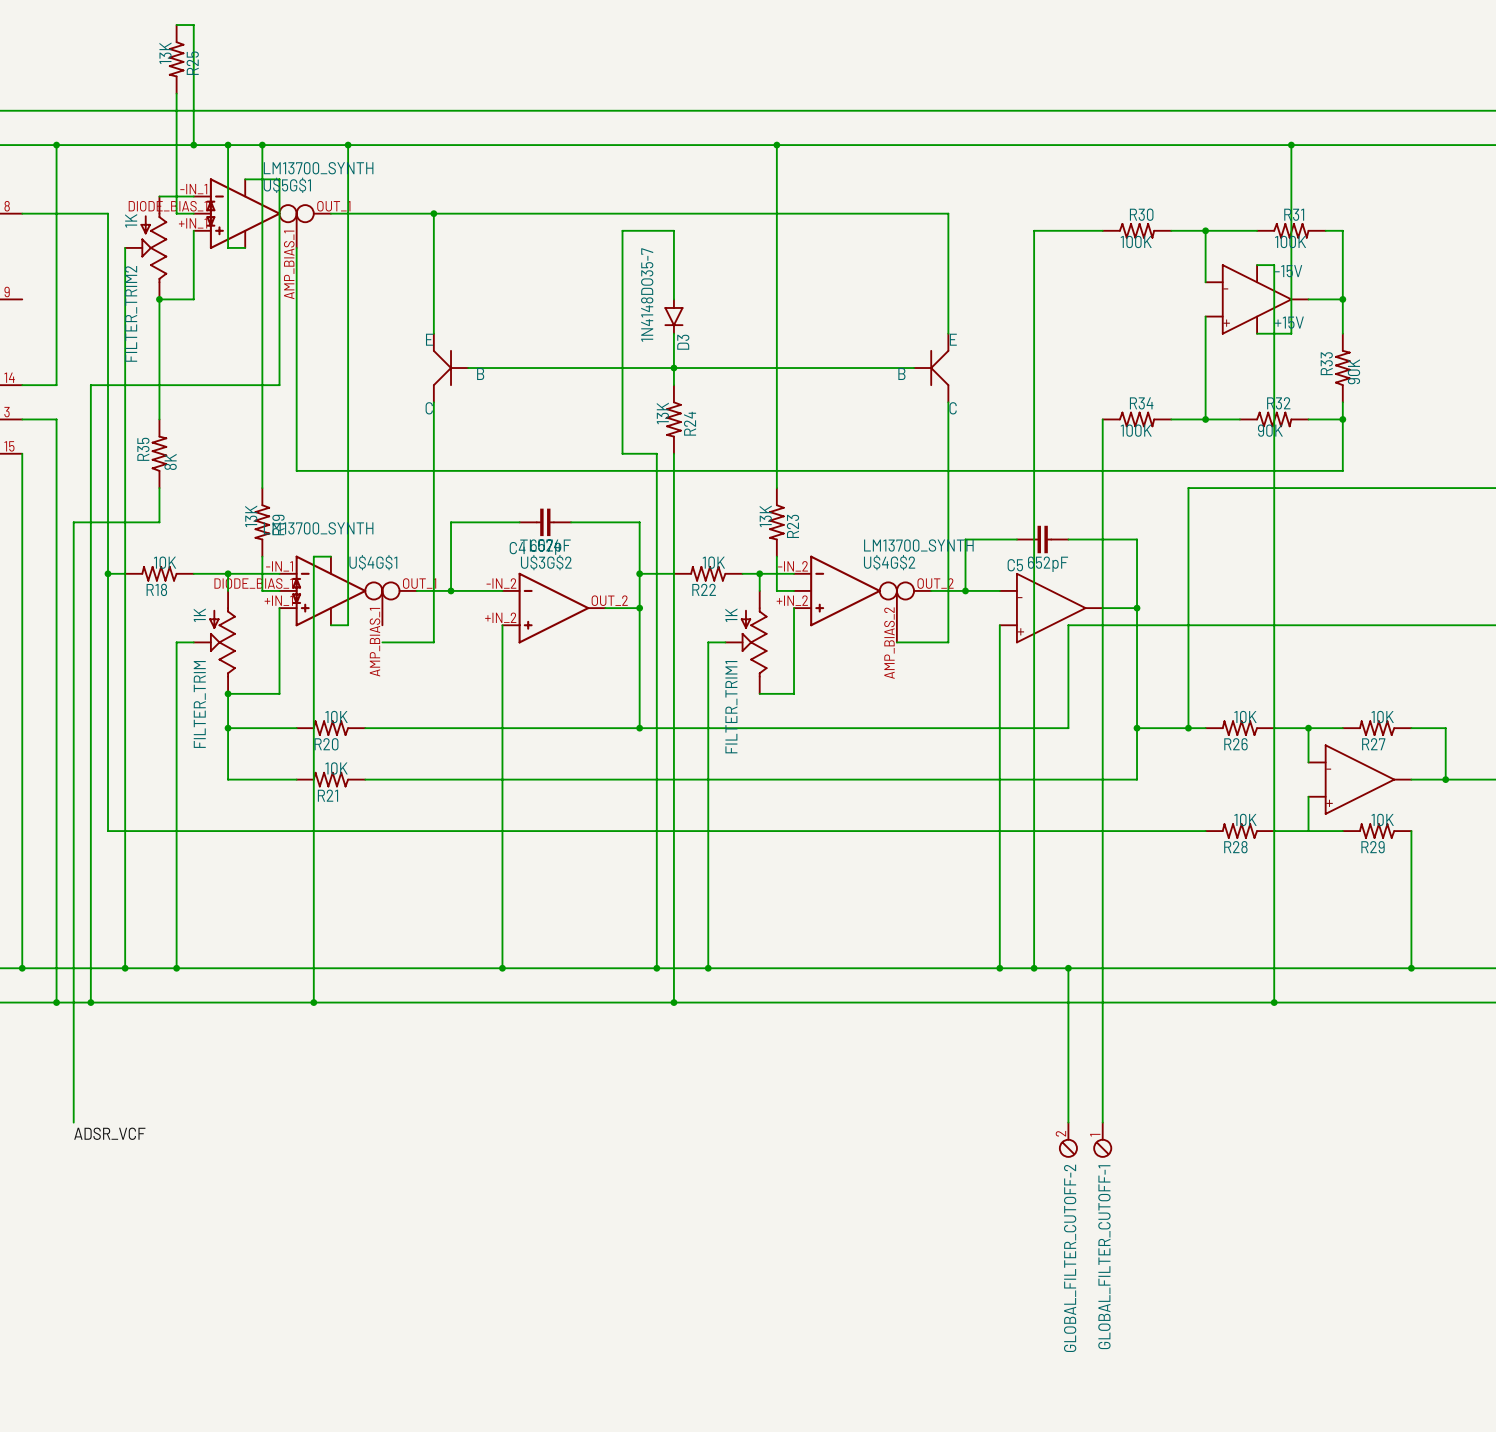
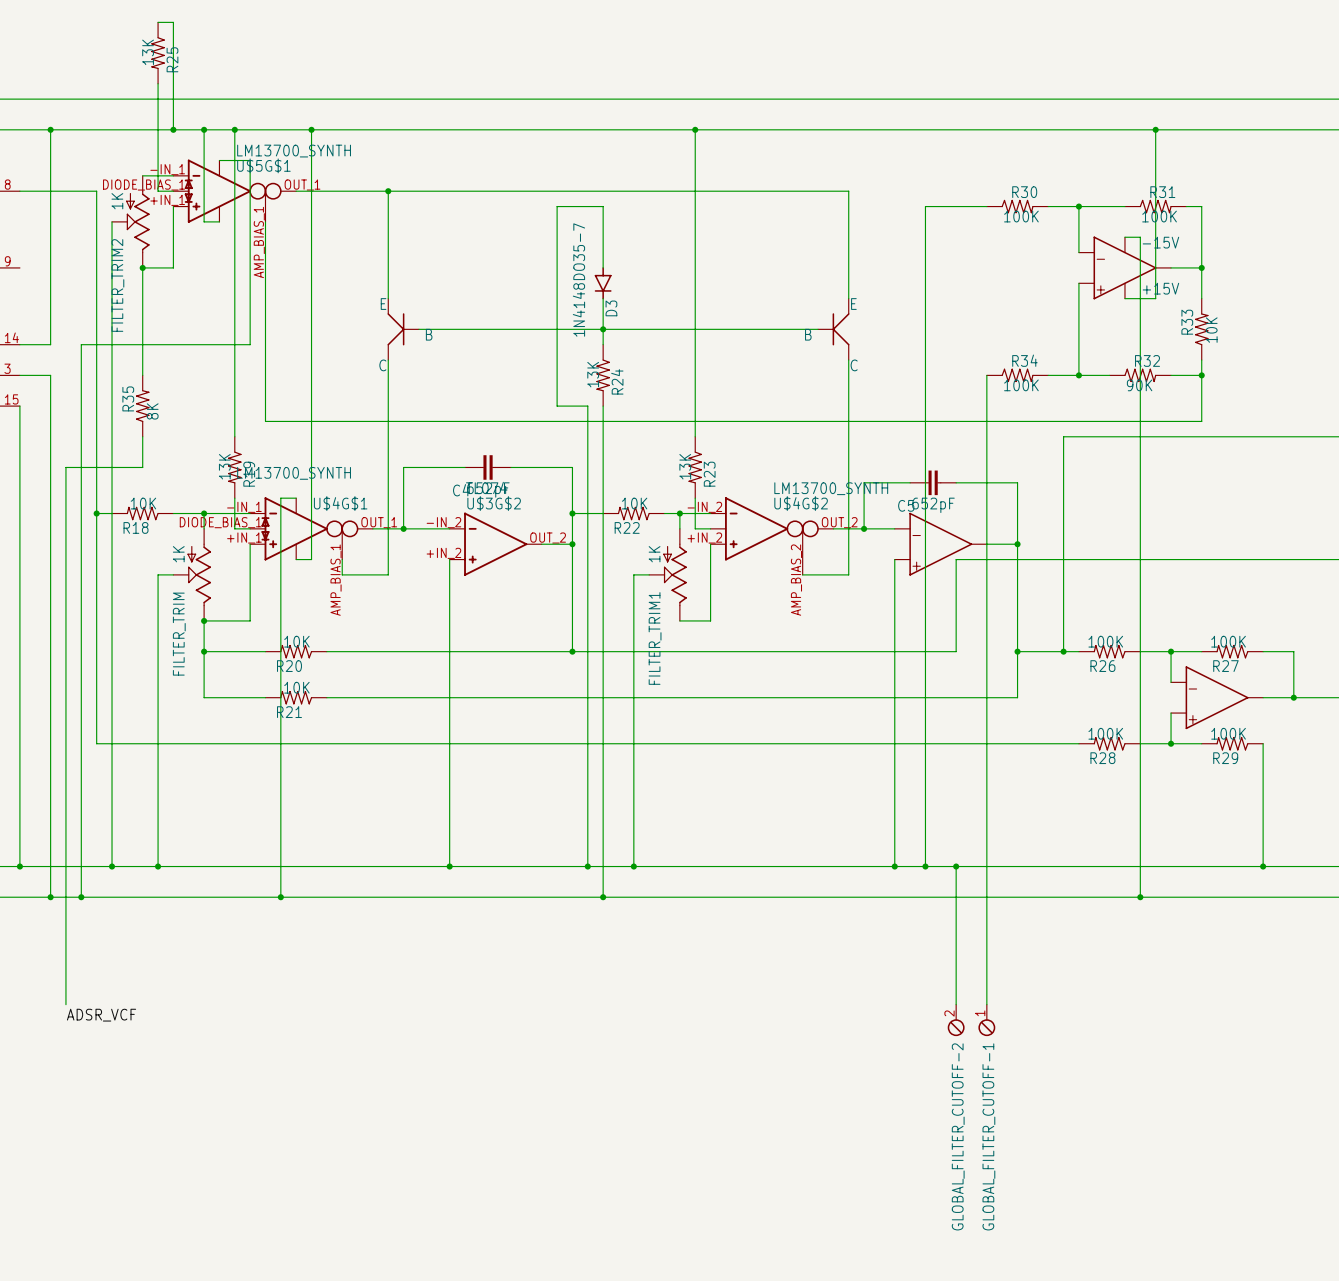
R33 text: 90K (1353, 371) -> 10K (1211, 330)
wire: none -> (342, 559) (342, 574)
R26 text: 10K (1245, 717) -> 100K (1105, 641)
R27 text: 10K (1382, 717) -> 100K (1228, 641)
R28 text: 10K (1245, 819) -> 100K (1105, 733)
R29 text: 10K (1382, 819) -> 100K (1228, 733)
junction: none -> (1171, 743)

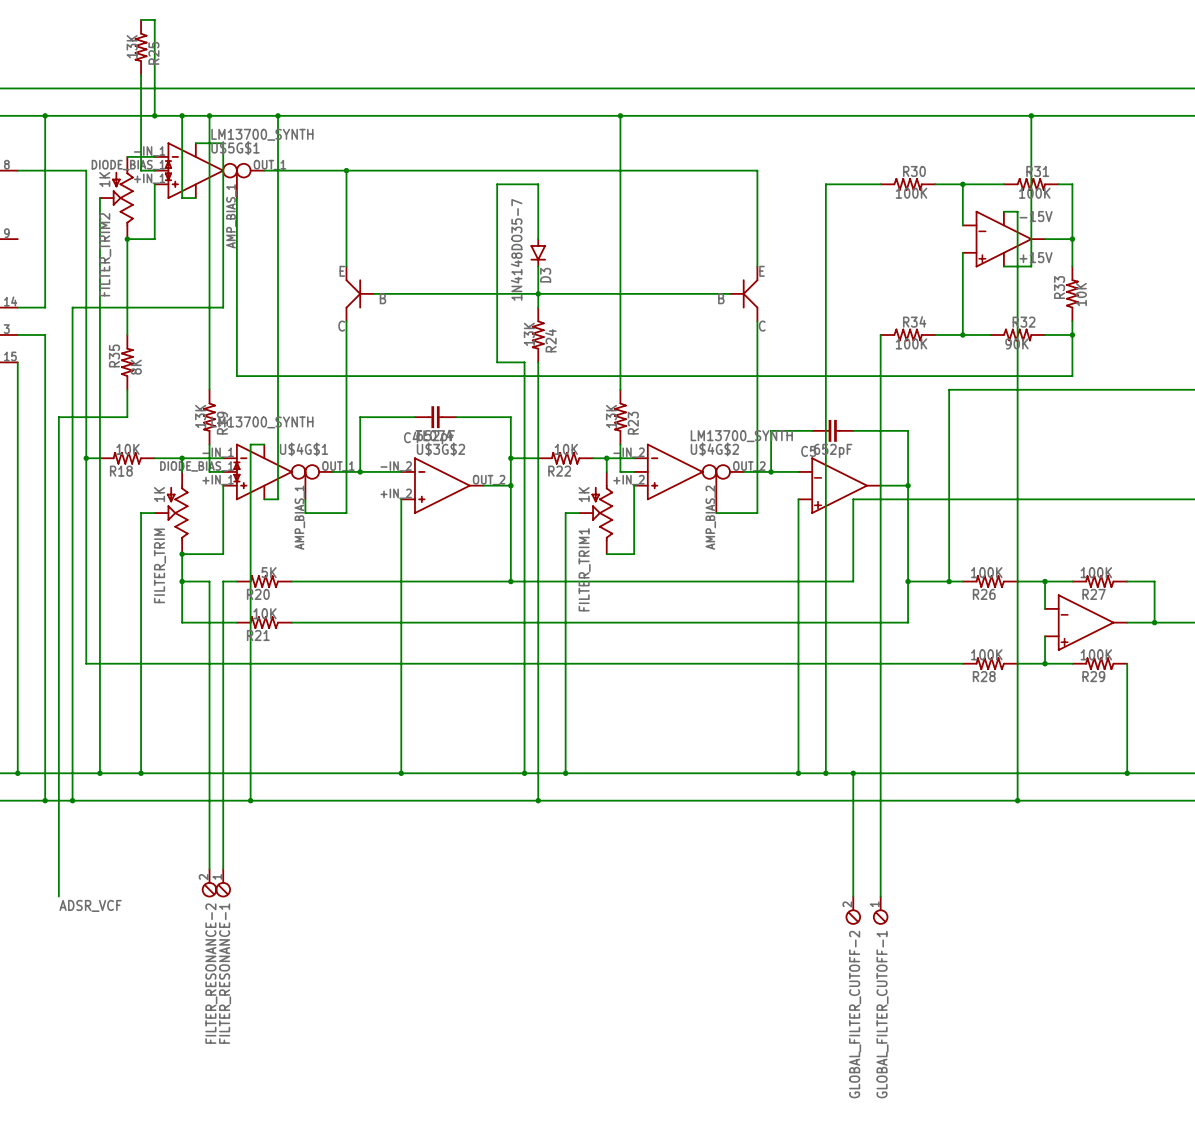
R20 text: 10K (296, 641) -> 5K (269, 572)
wire: (234, 651) (250, 651) -> (209, 581) (209, 869)
wire: none -> (223, 581) (223, 869)
FILTER_RESONANCE-2: none -> (209, 883)
FILTER_RESONANCE-1: none -> (223, 883)

